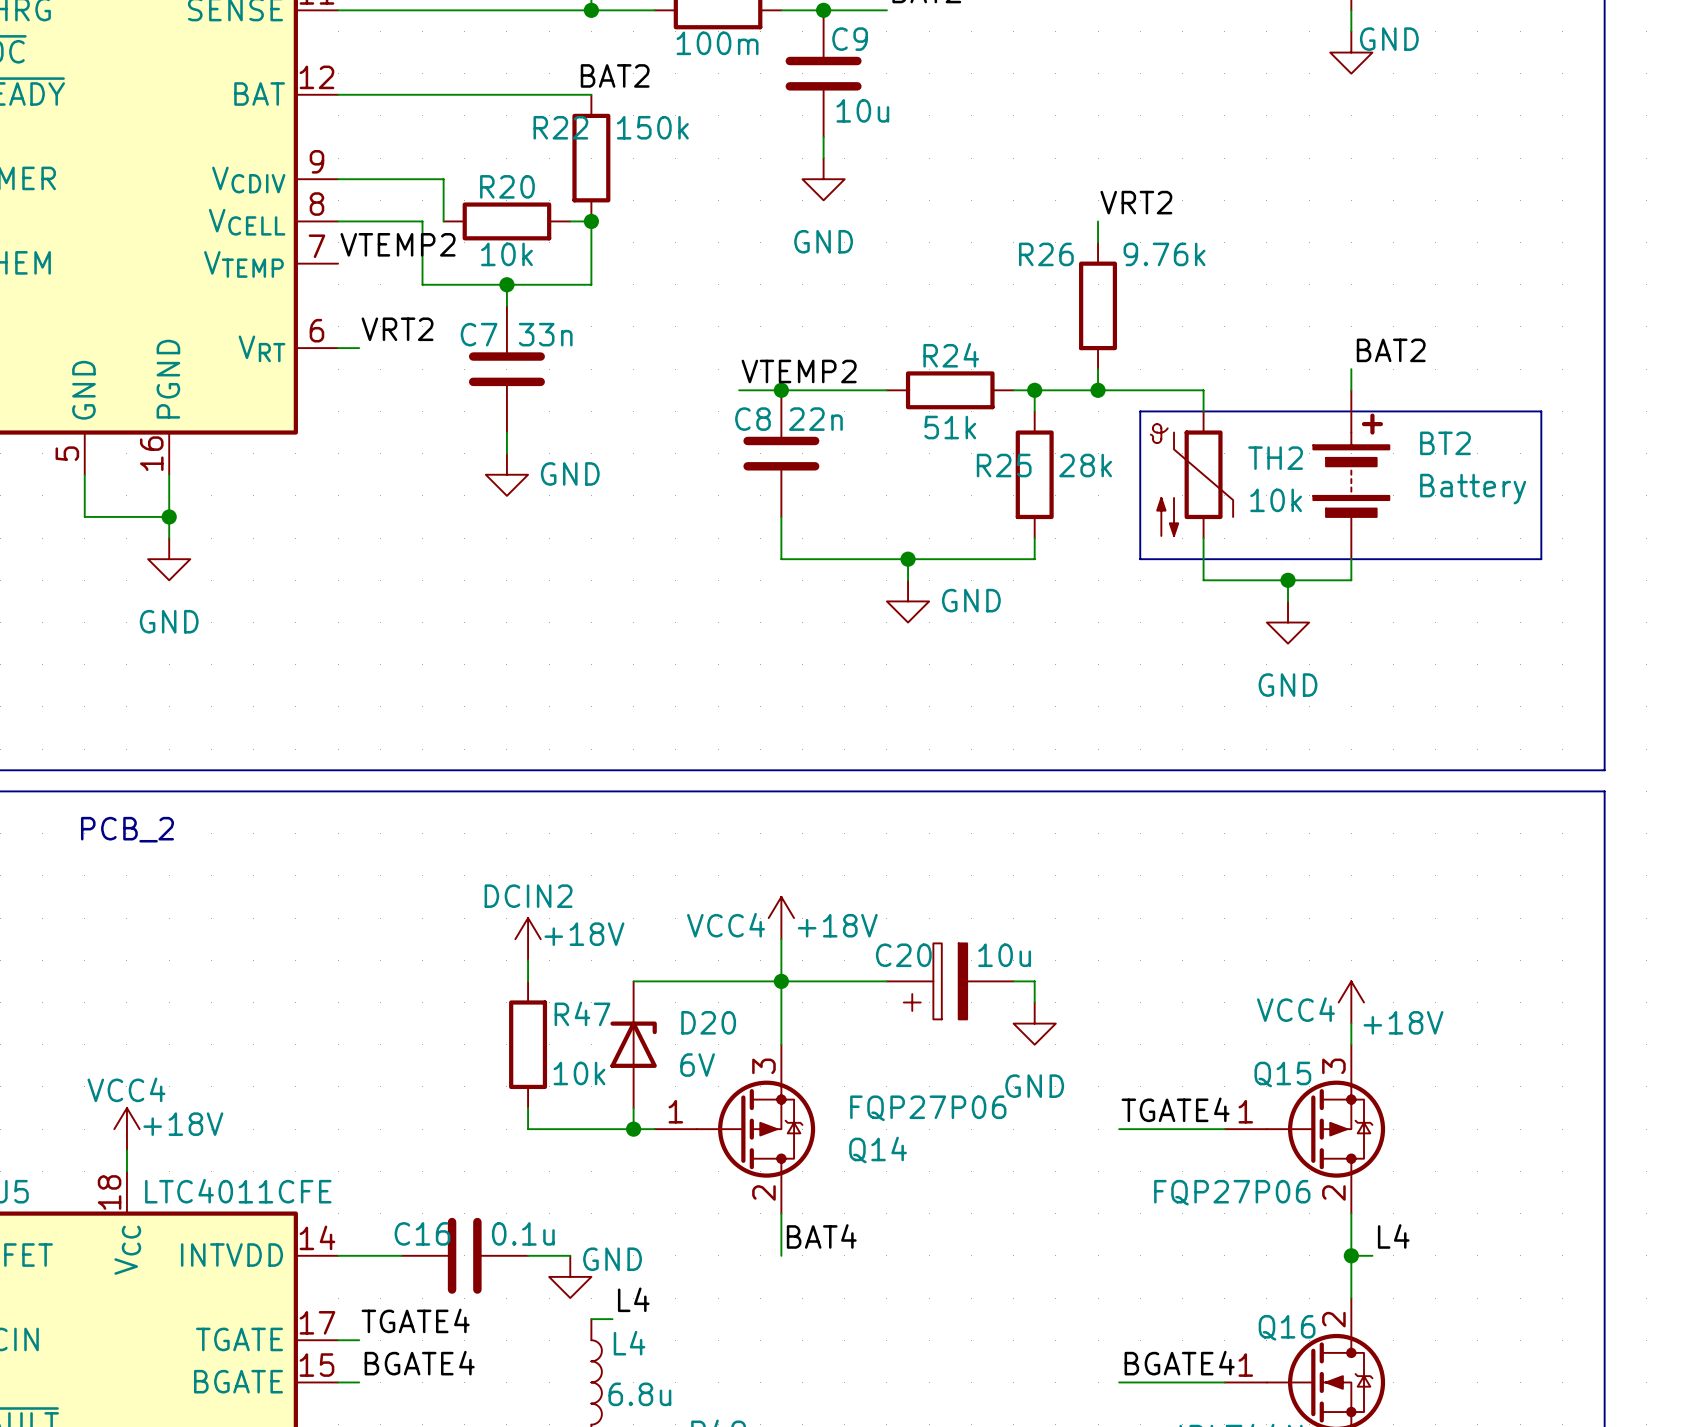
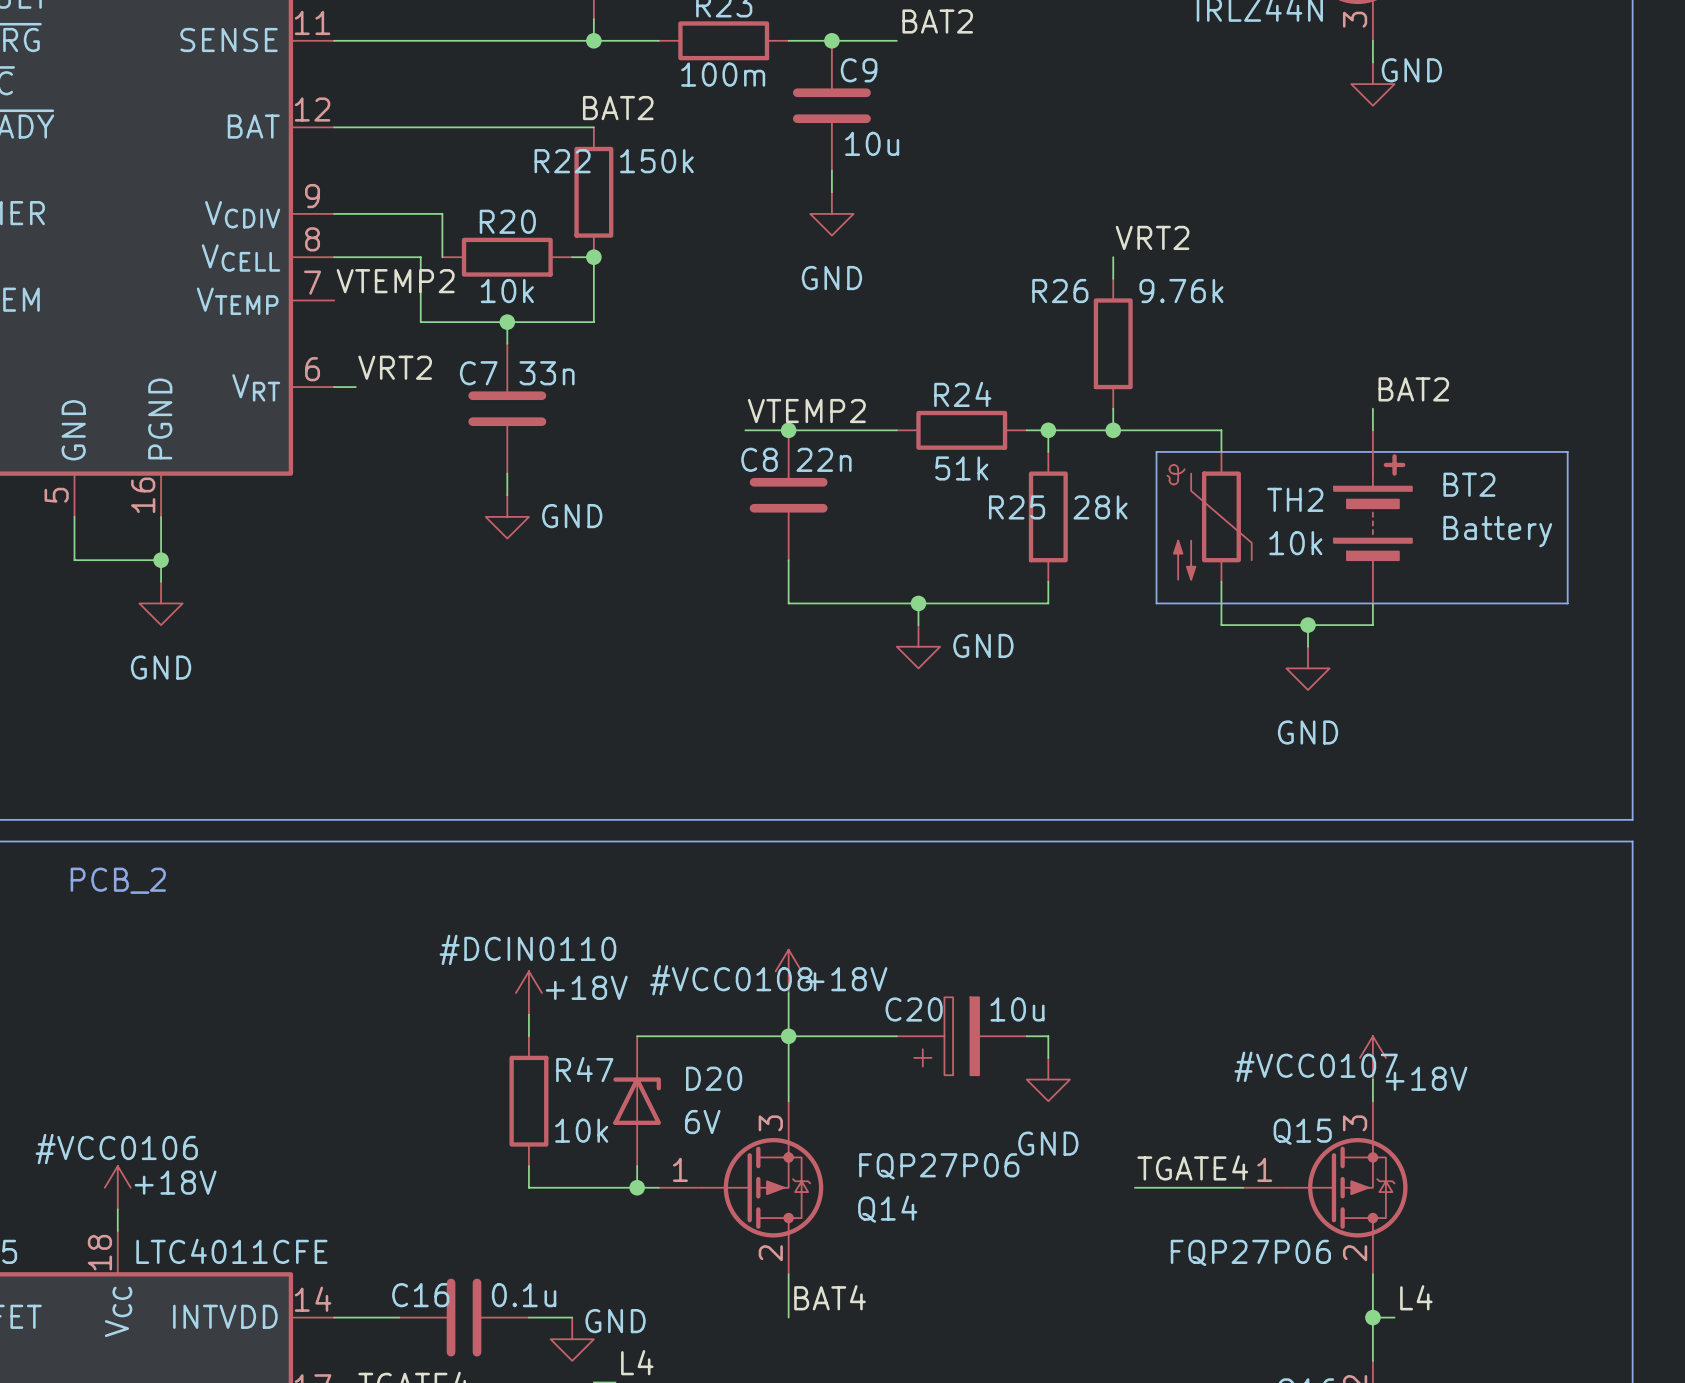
DCIN2 name: DCIN2 (528, 896) -> #DCIN0110 (527, 949)
VCC4 name: VCC4 (725, 925) -> #VCC0108 (731, 980)
VCC4 name: VCC4 (1295, 1009) -> #VCC0107 (1316, 1066)
VCC4 name: VCC4 (126, 1089) -> #VCC0106 (116, 1149)

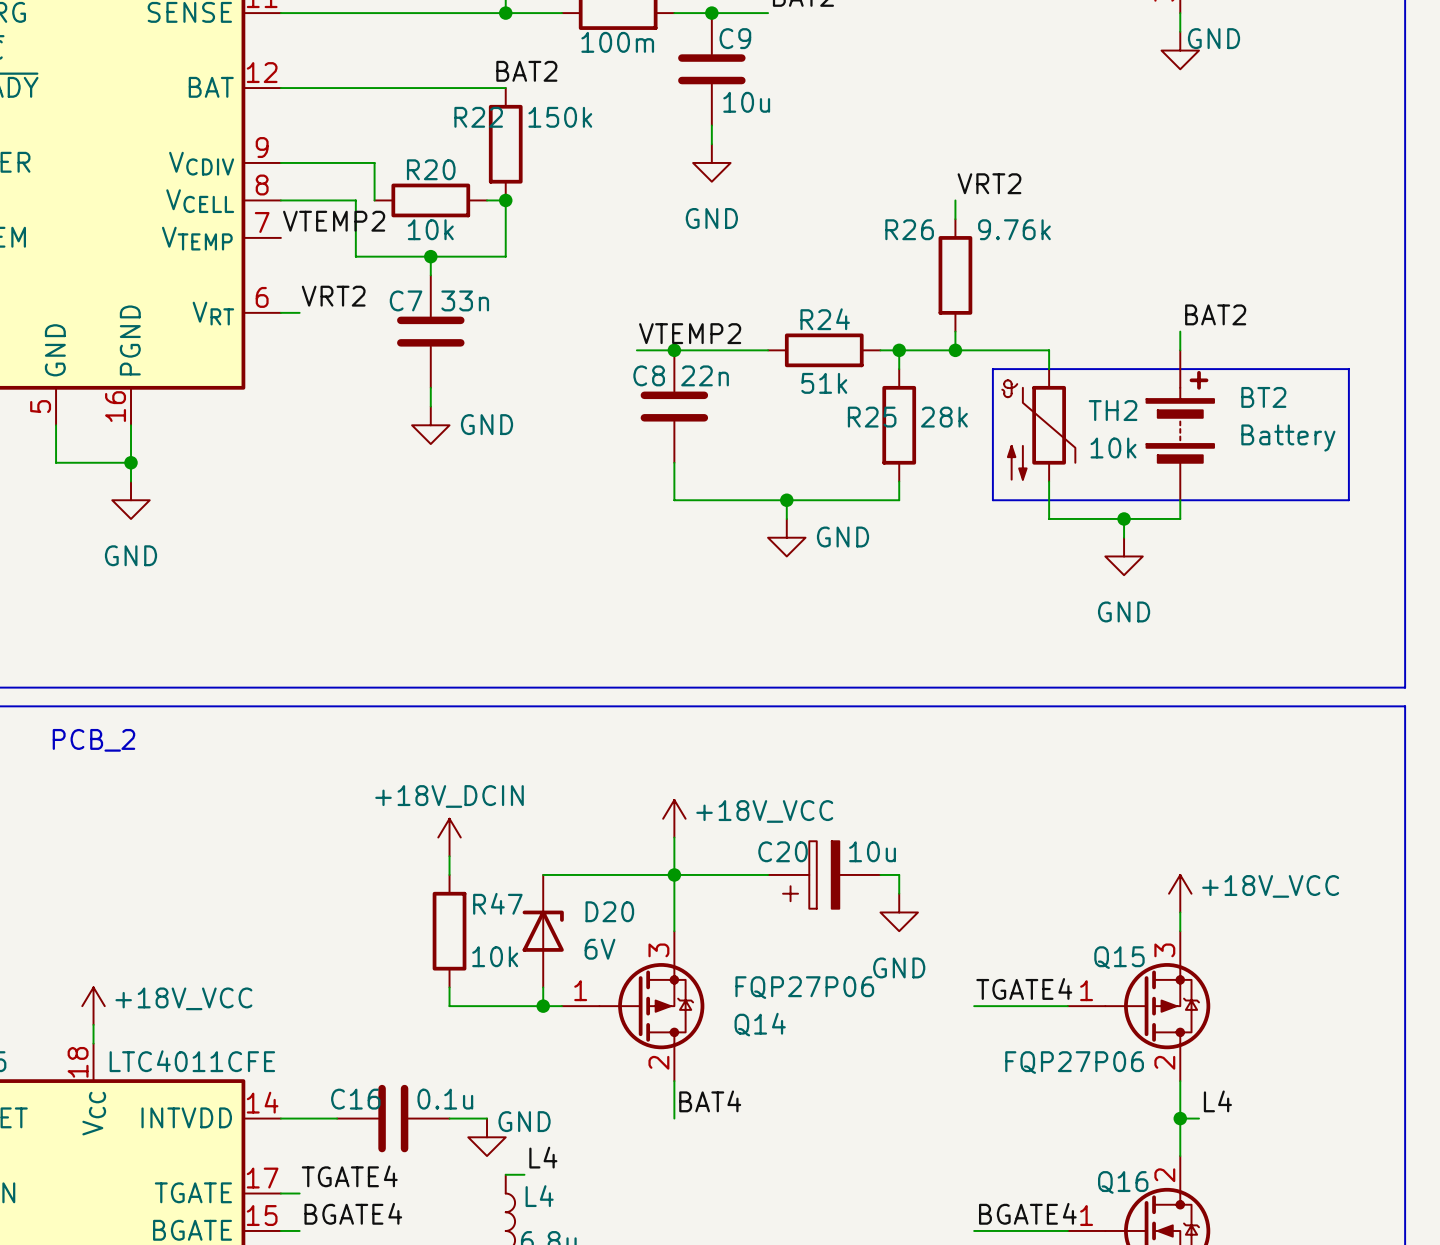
power symbol: +18V (788, 971) -> +18V_VCC (674, 818)
power symbol: +18V (528, 992) -> +18V_DCIN (449, 837)
power symbol: +18V (1372, 1057) -> +18V_VCC (1180, 893)
power symbol: +18V (117, 1187) -> +18V_VCC (93, 1006)

